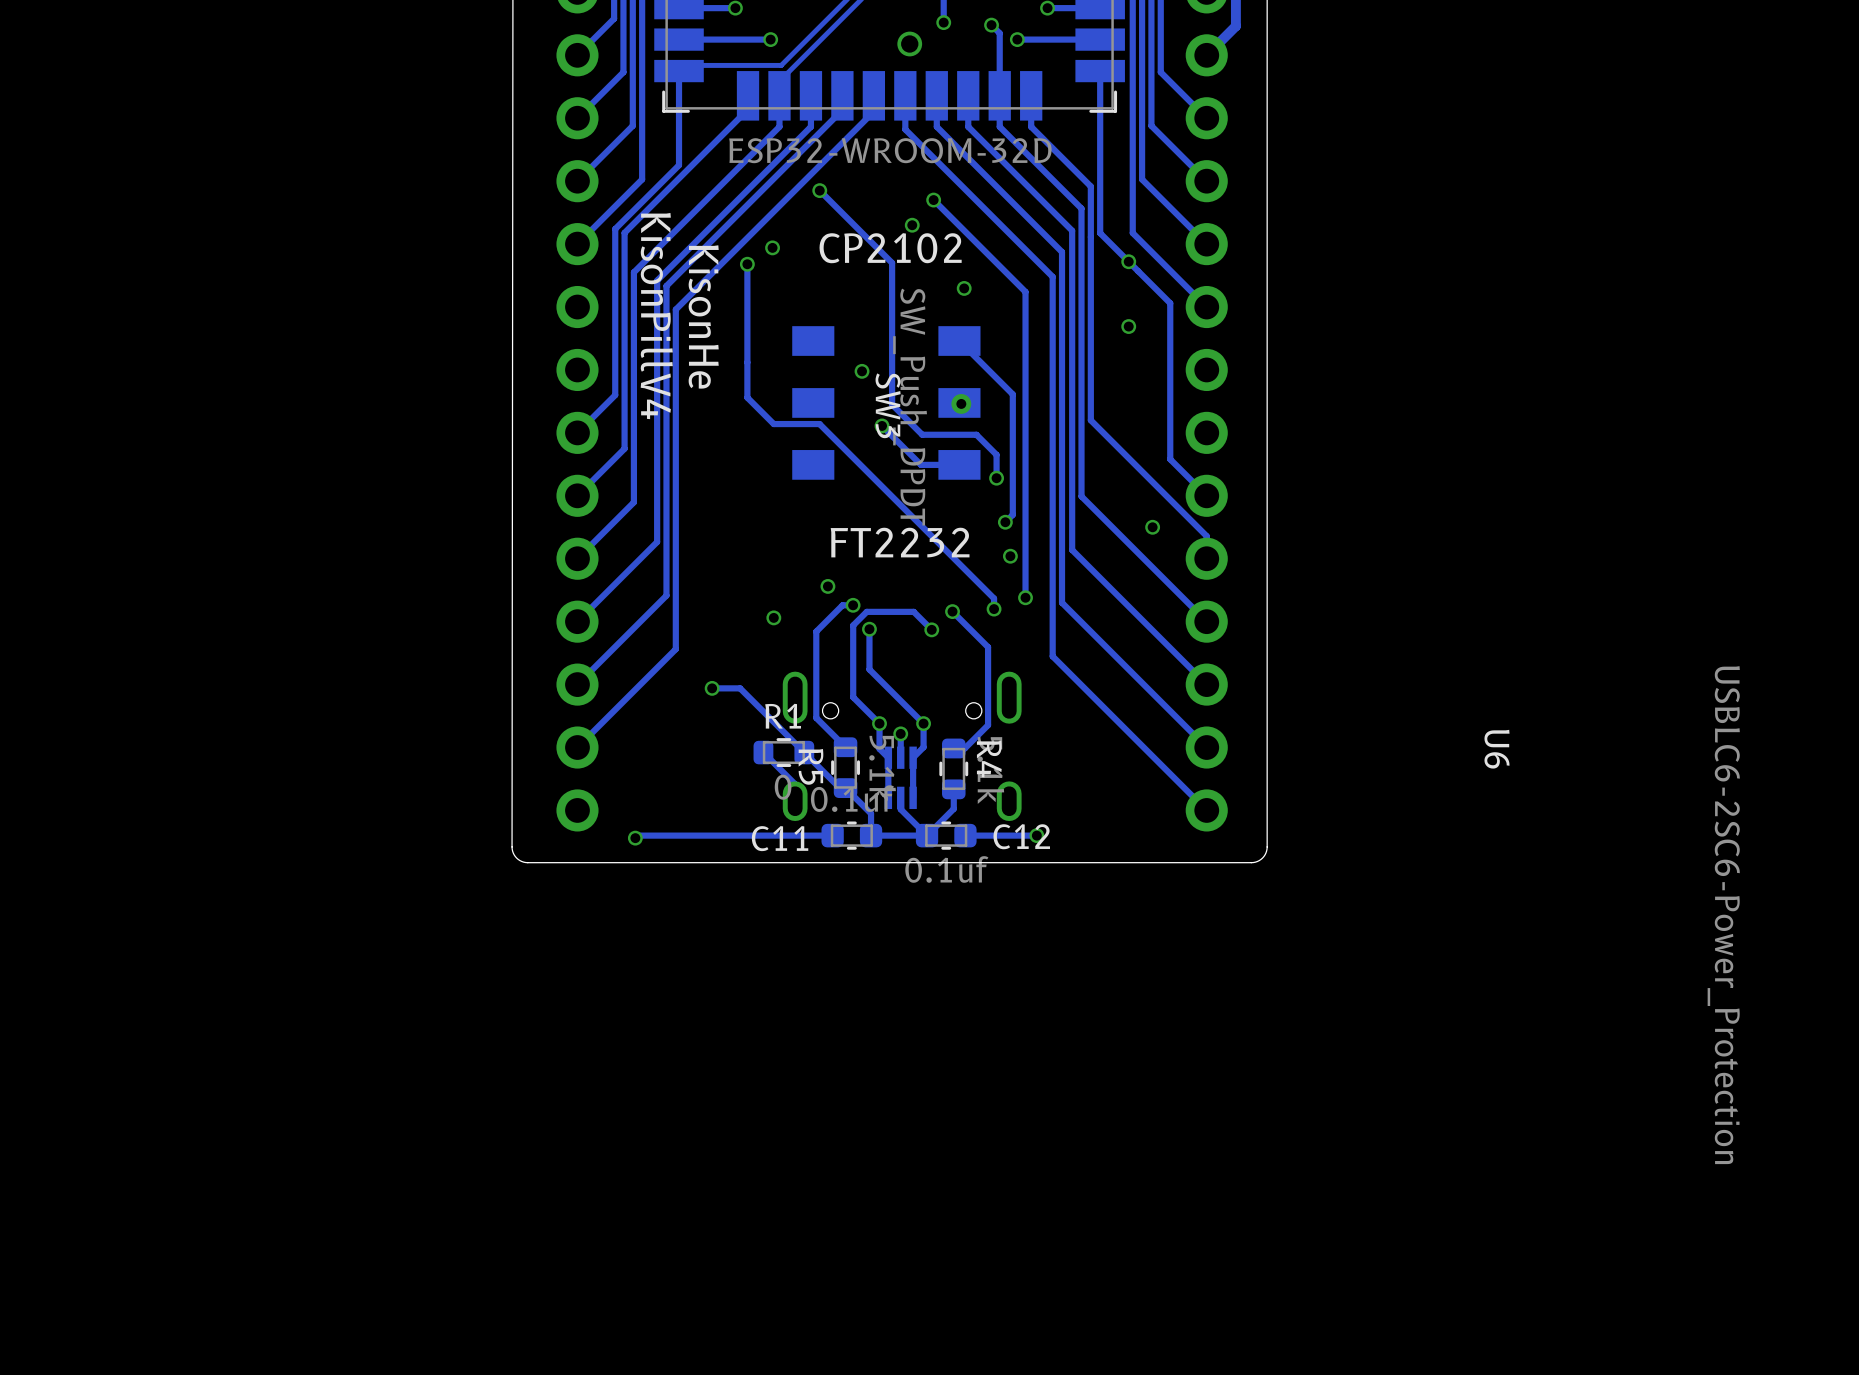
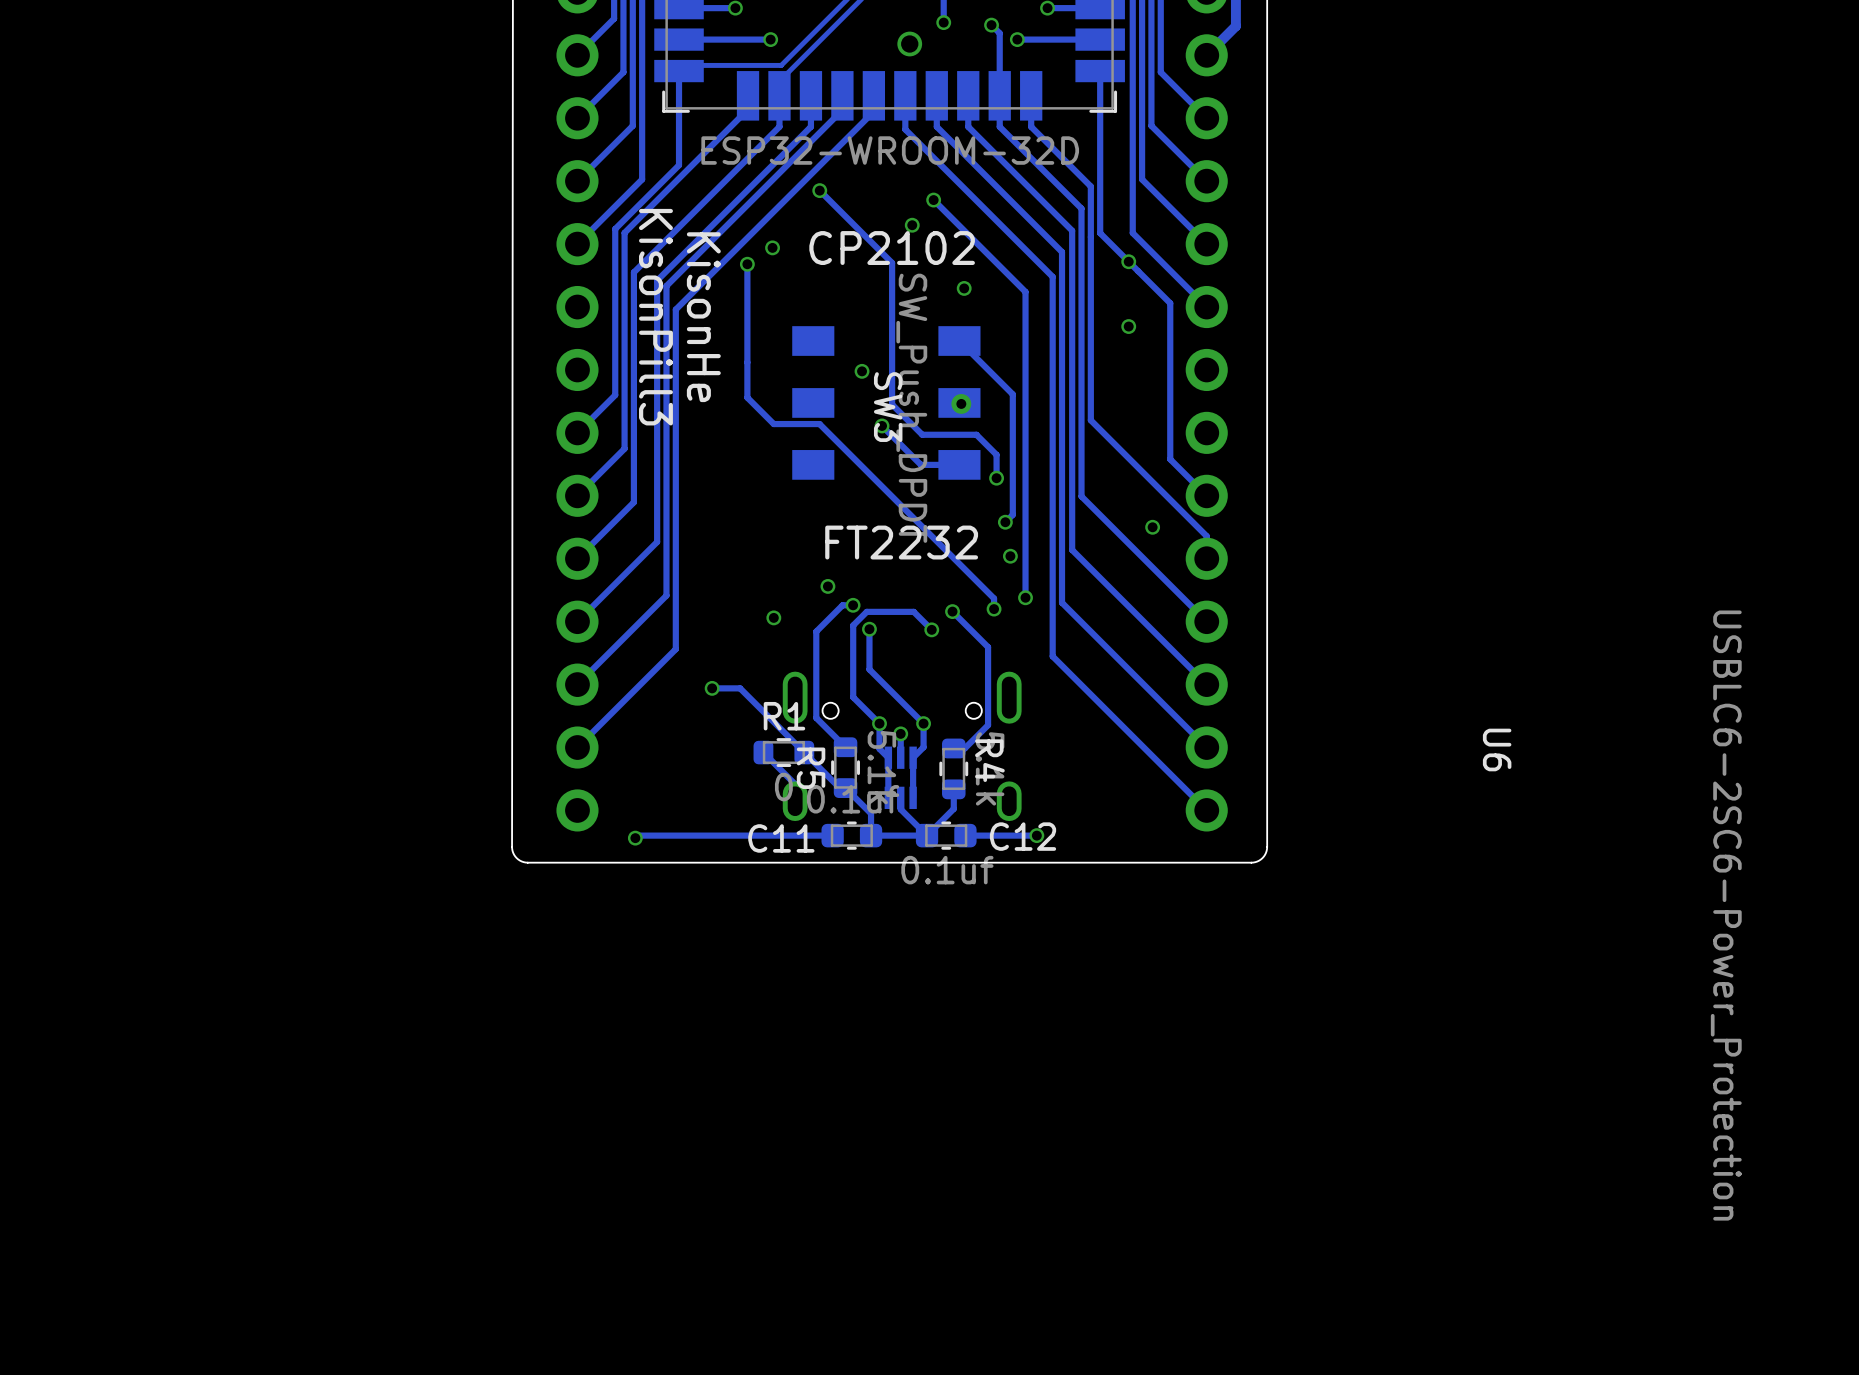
text: KisonPillV4 (656, 316) -> KisonPill3 (655, 317)

